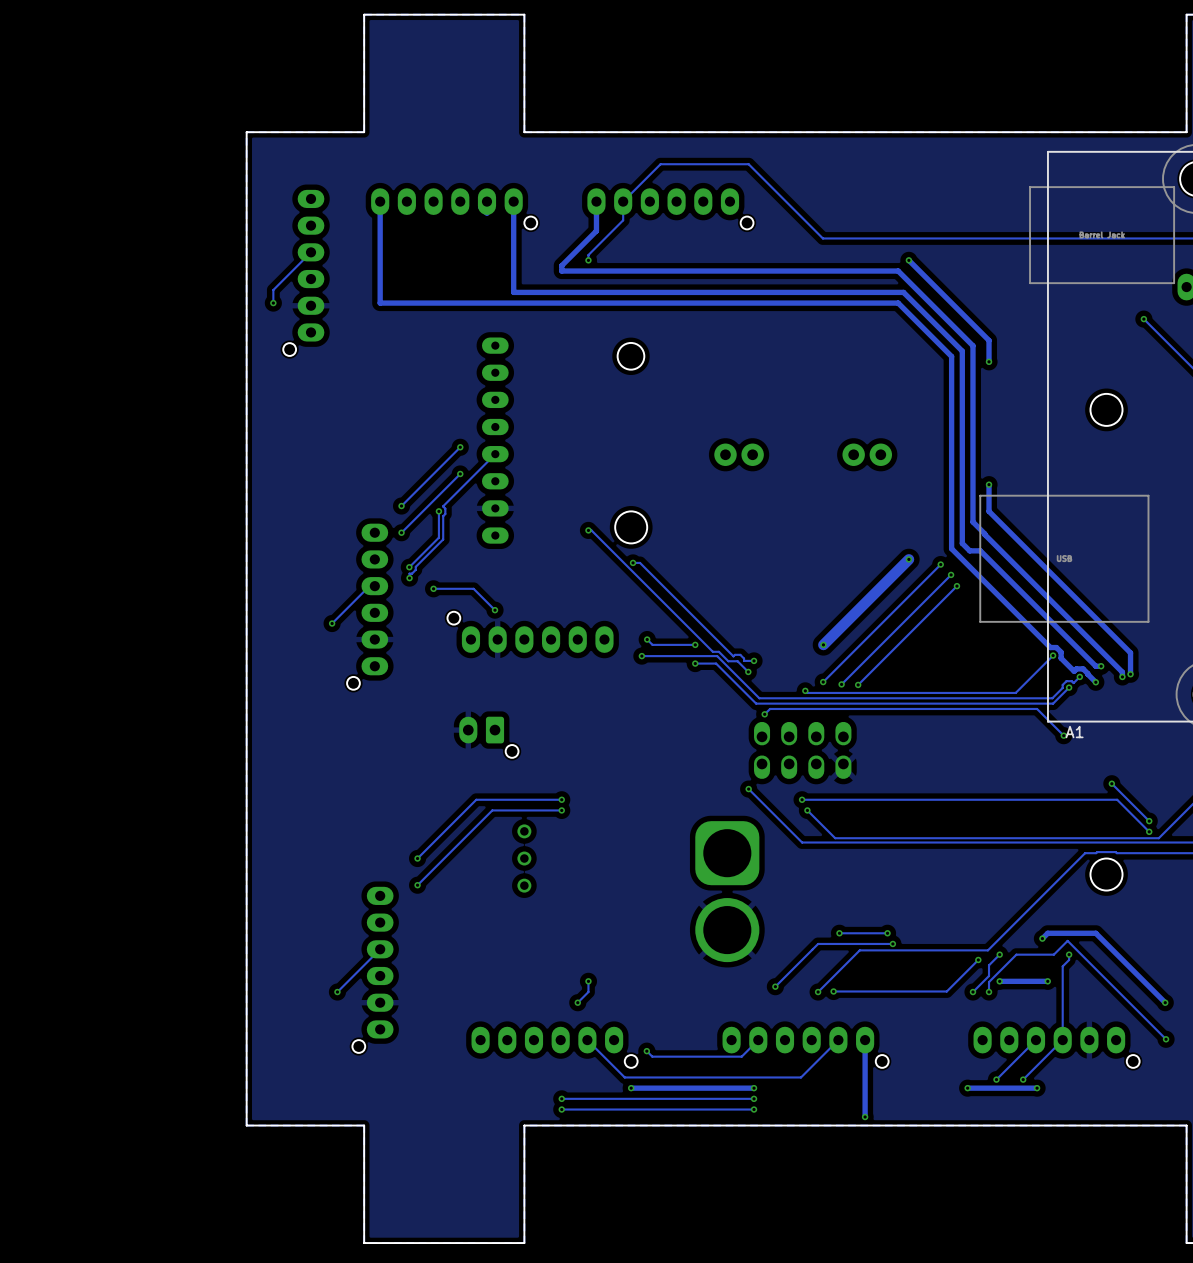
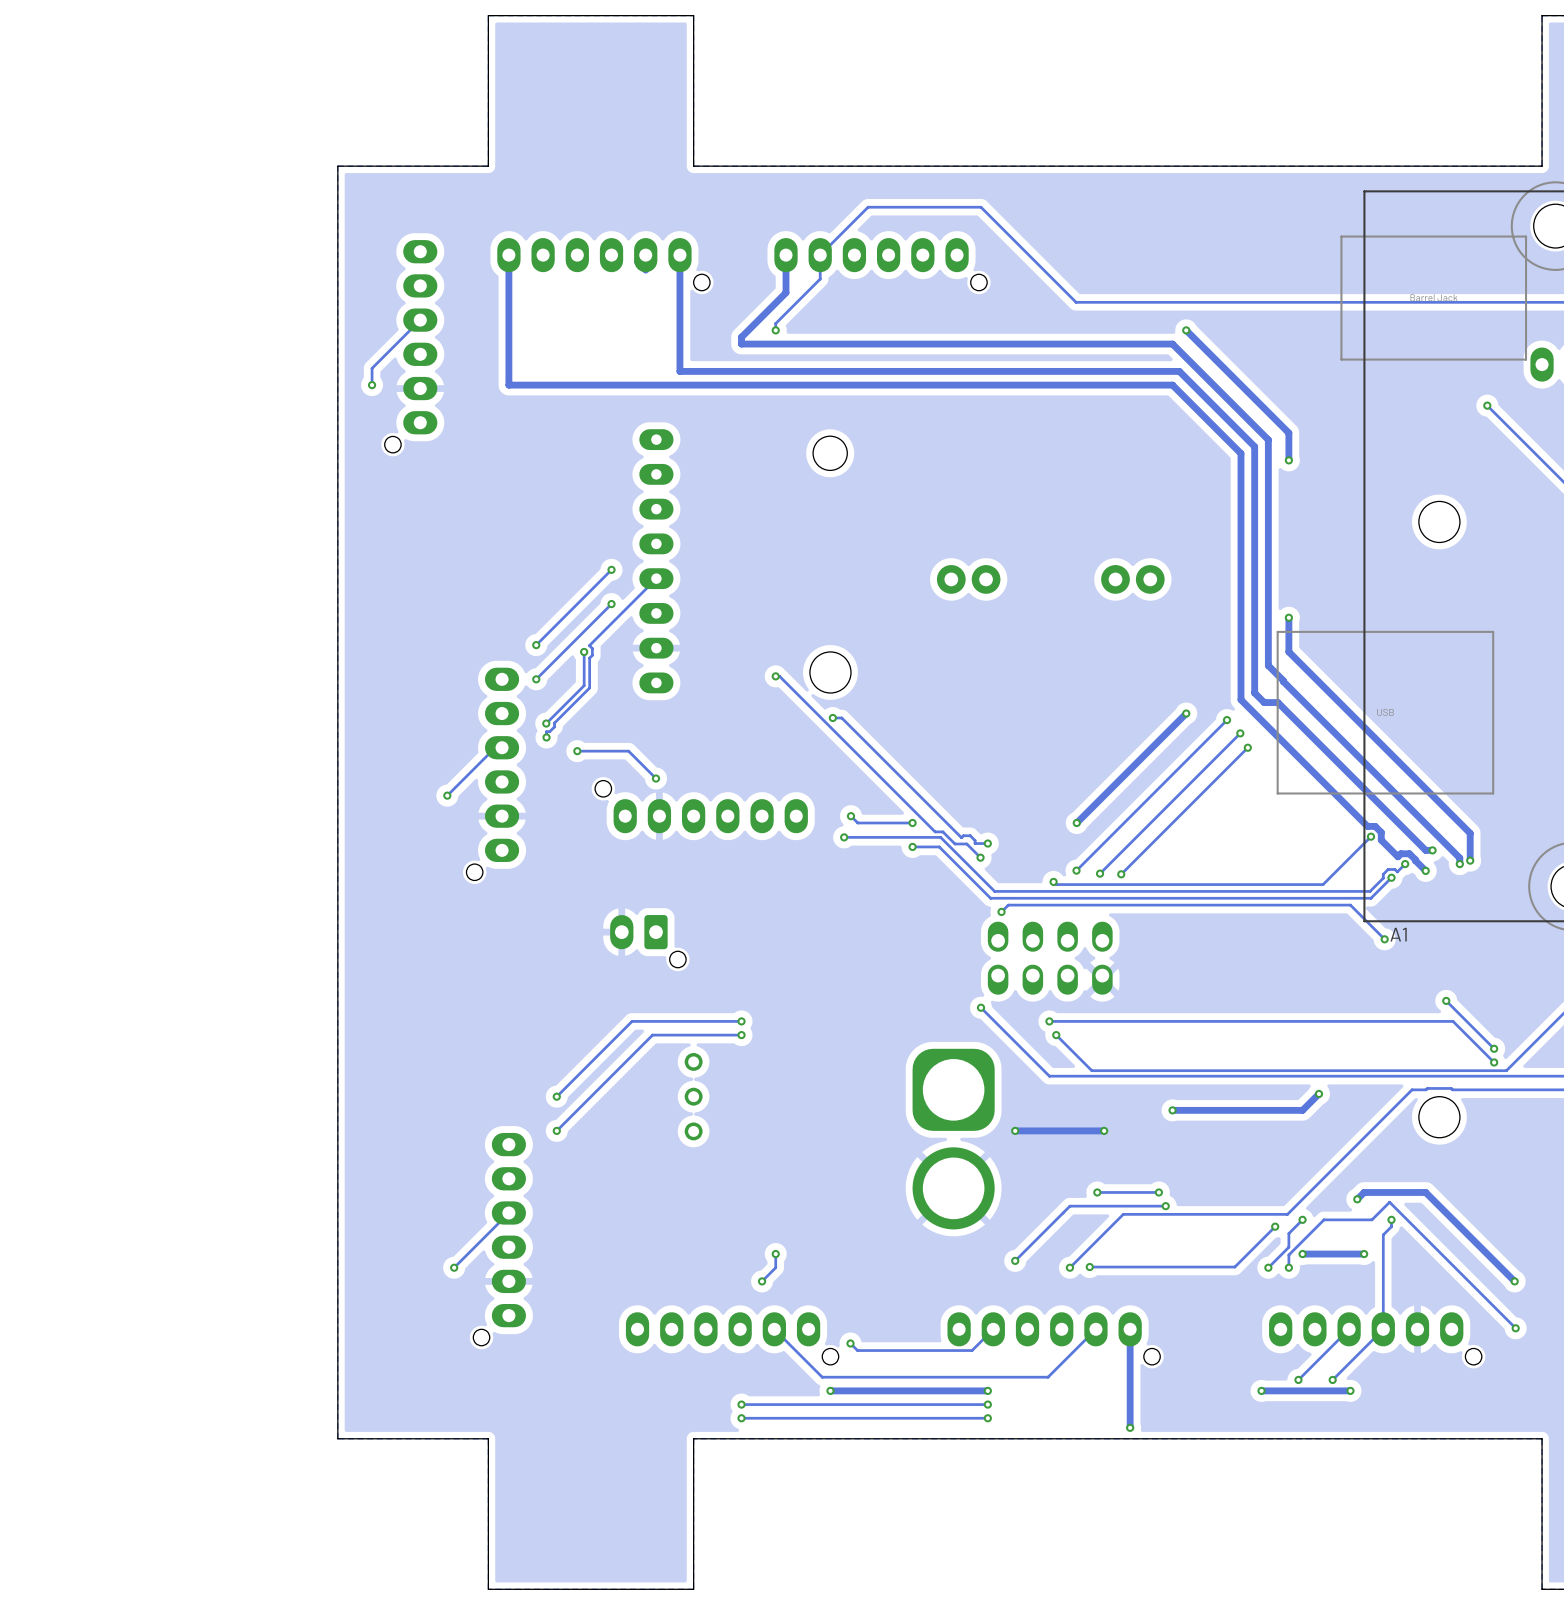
track width: thick (908, 559) (823, 644) -> thin (1186, 713) (1076, 823)
track: none -> (1318, 1093) (1302, 1110) (1172, 1110)
via: none -> (1318, 1093)
via: none -> (1172, 1110)
via: none -> (1015, 1130)
track: none -> (1104, 1130) (1015, 1130)
via: none -> (1104, 1130)

